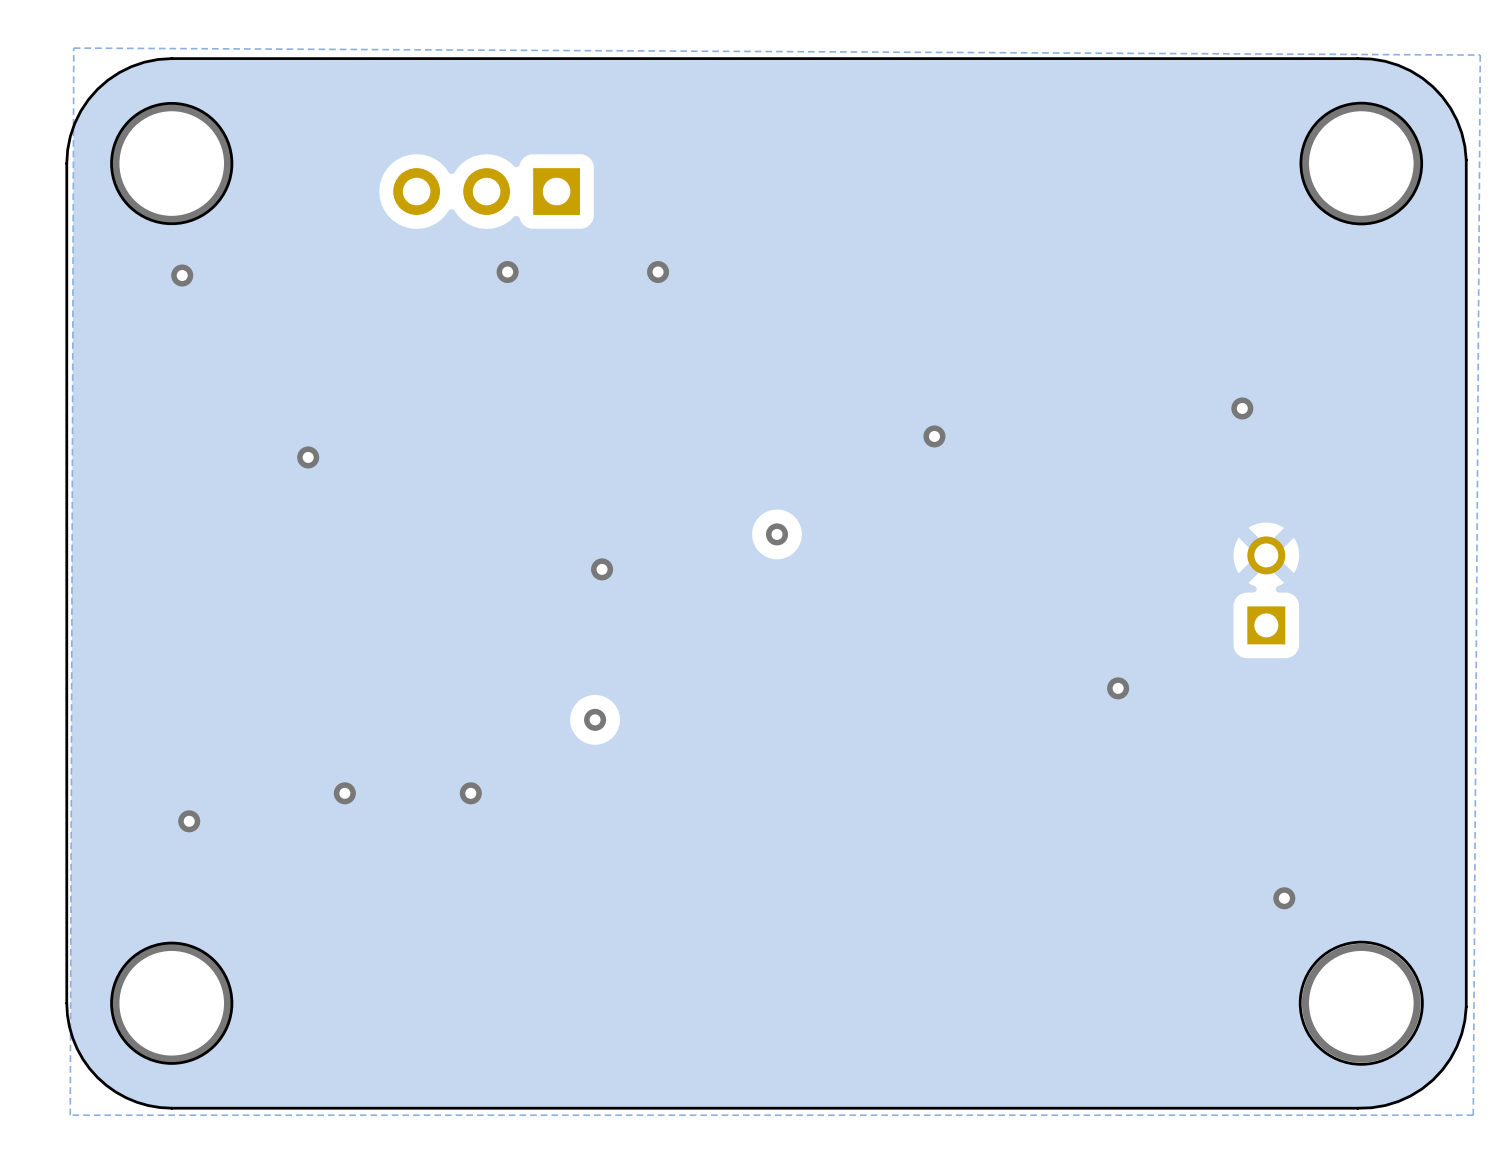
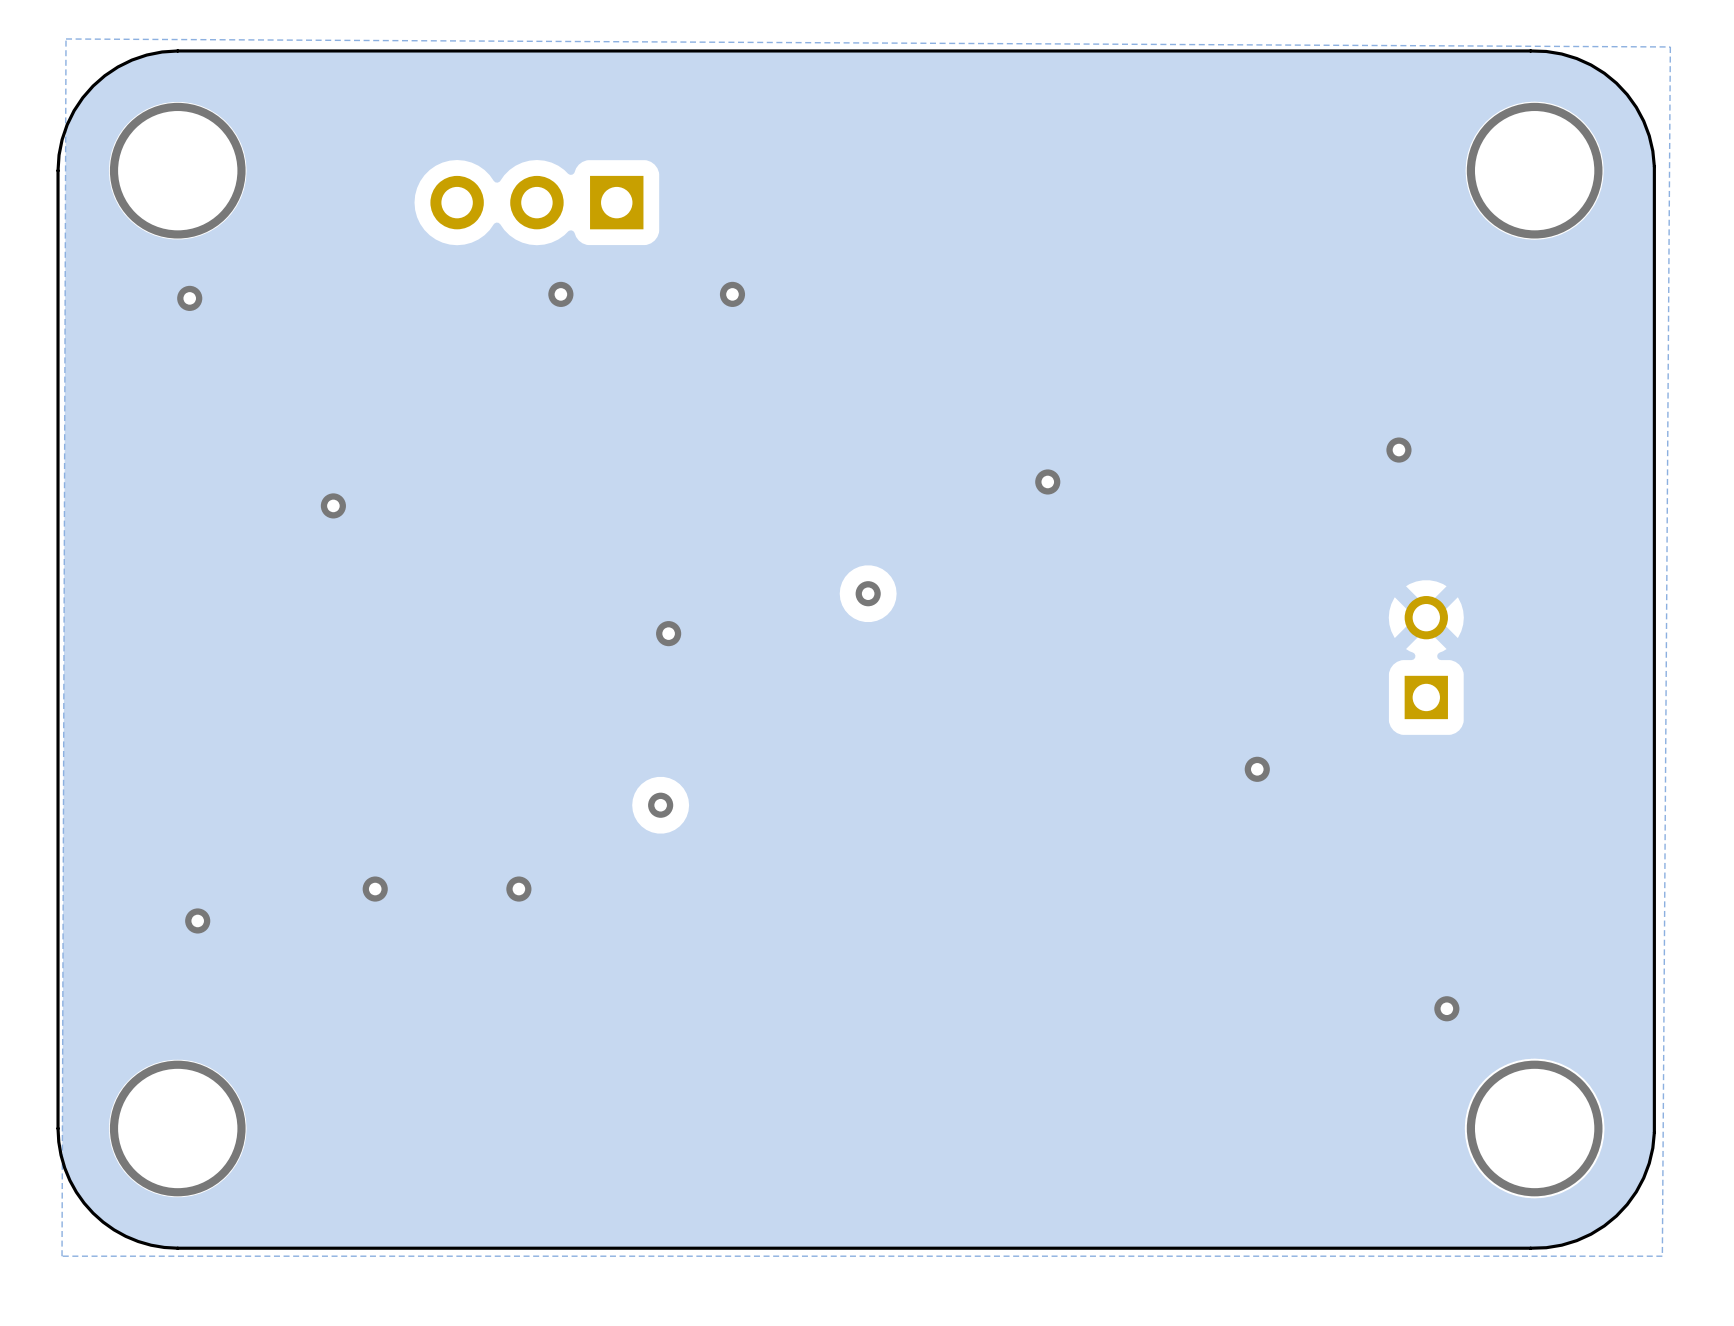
round board edge: [110, 101, 234, 226] -> none
round board edge: [1299, 101, 1424, 226] -> none
round board edge: [1298, 940, 1424, 1066] -> none
round board edge: [110, 941, 234, 1065] -> none

